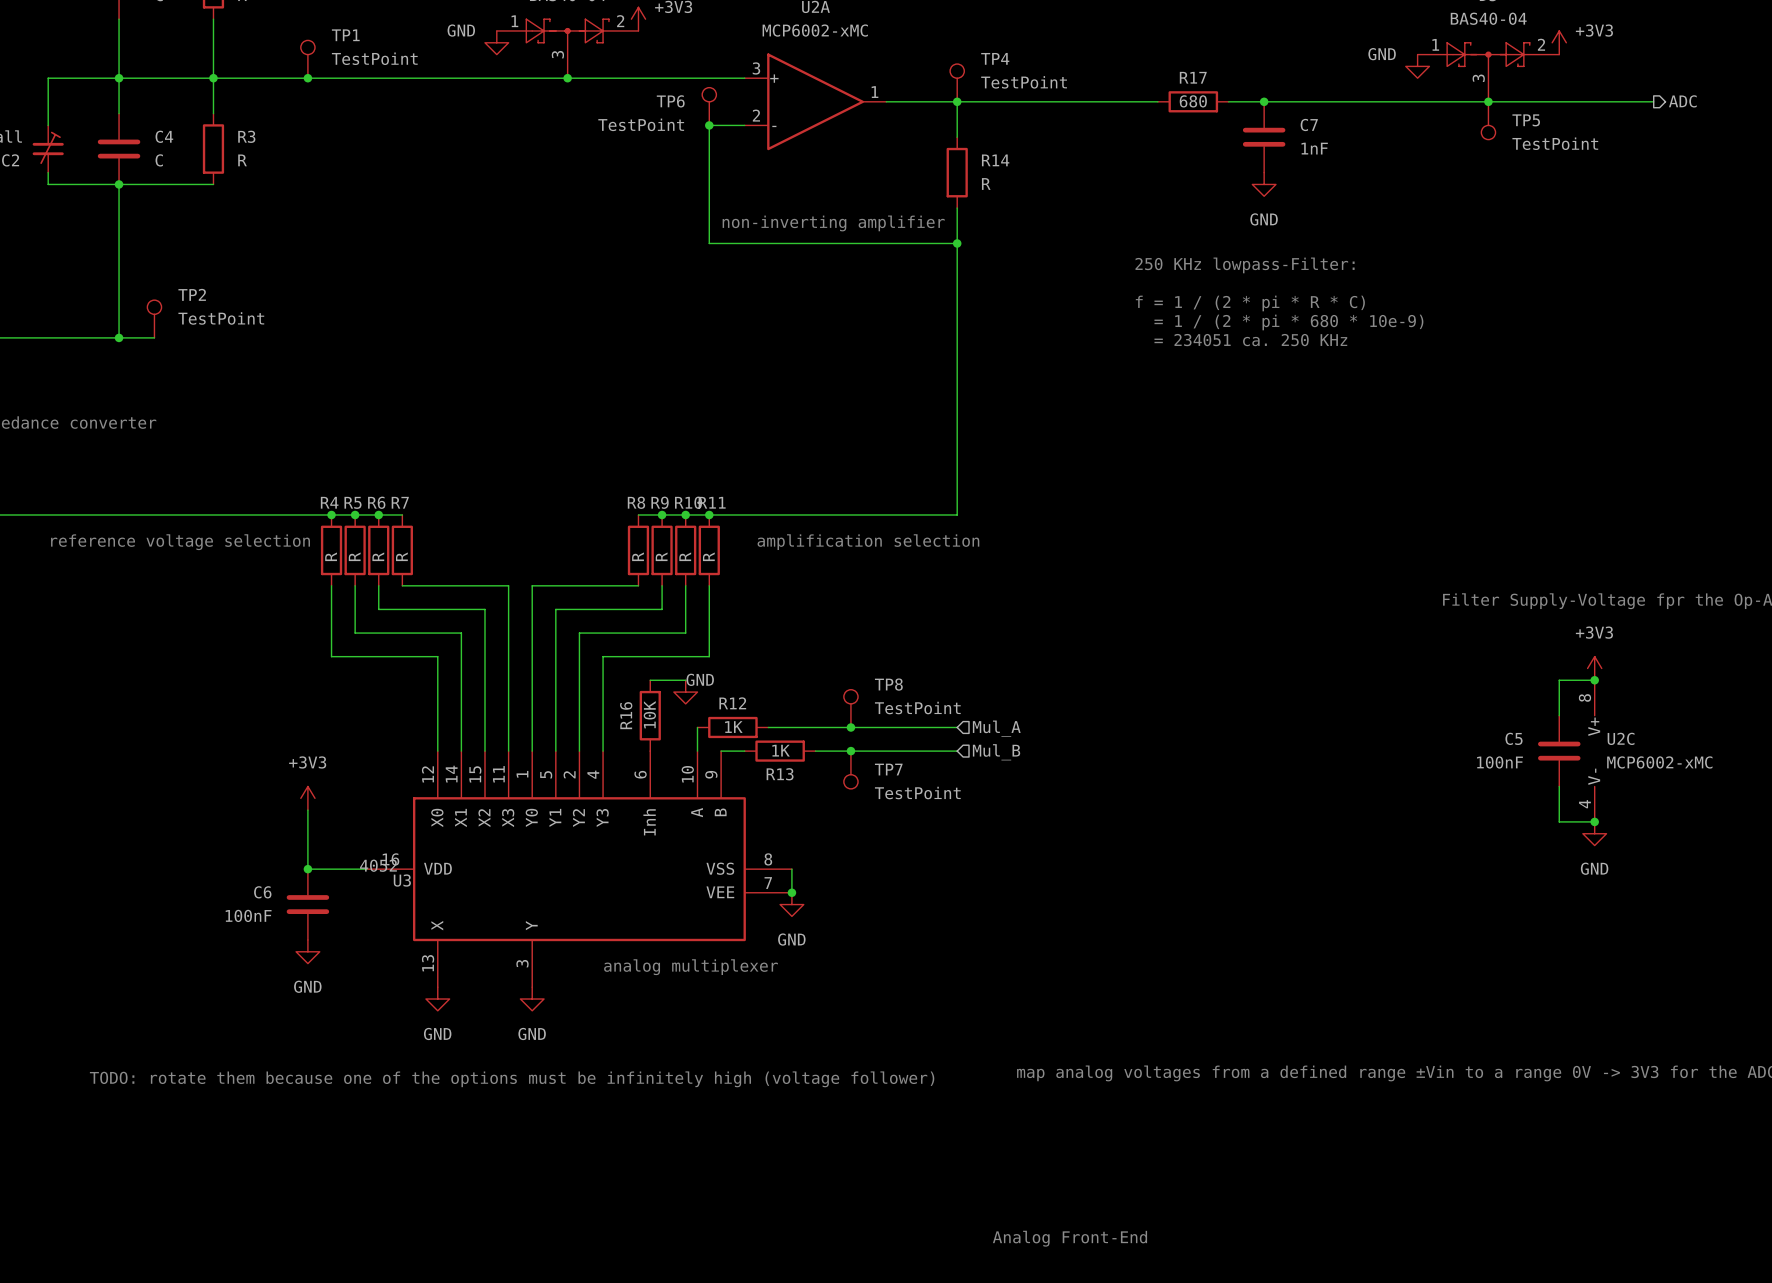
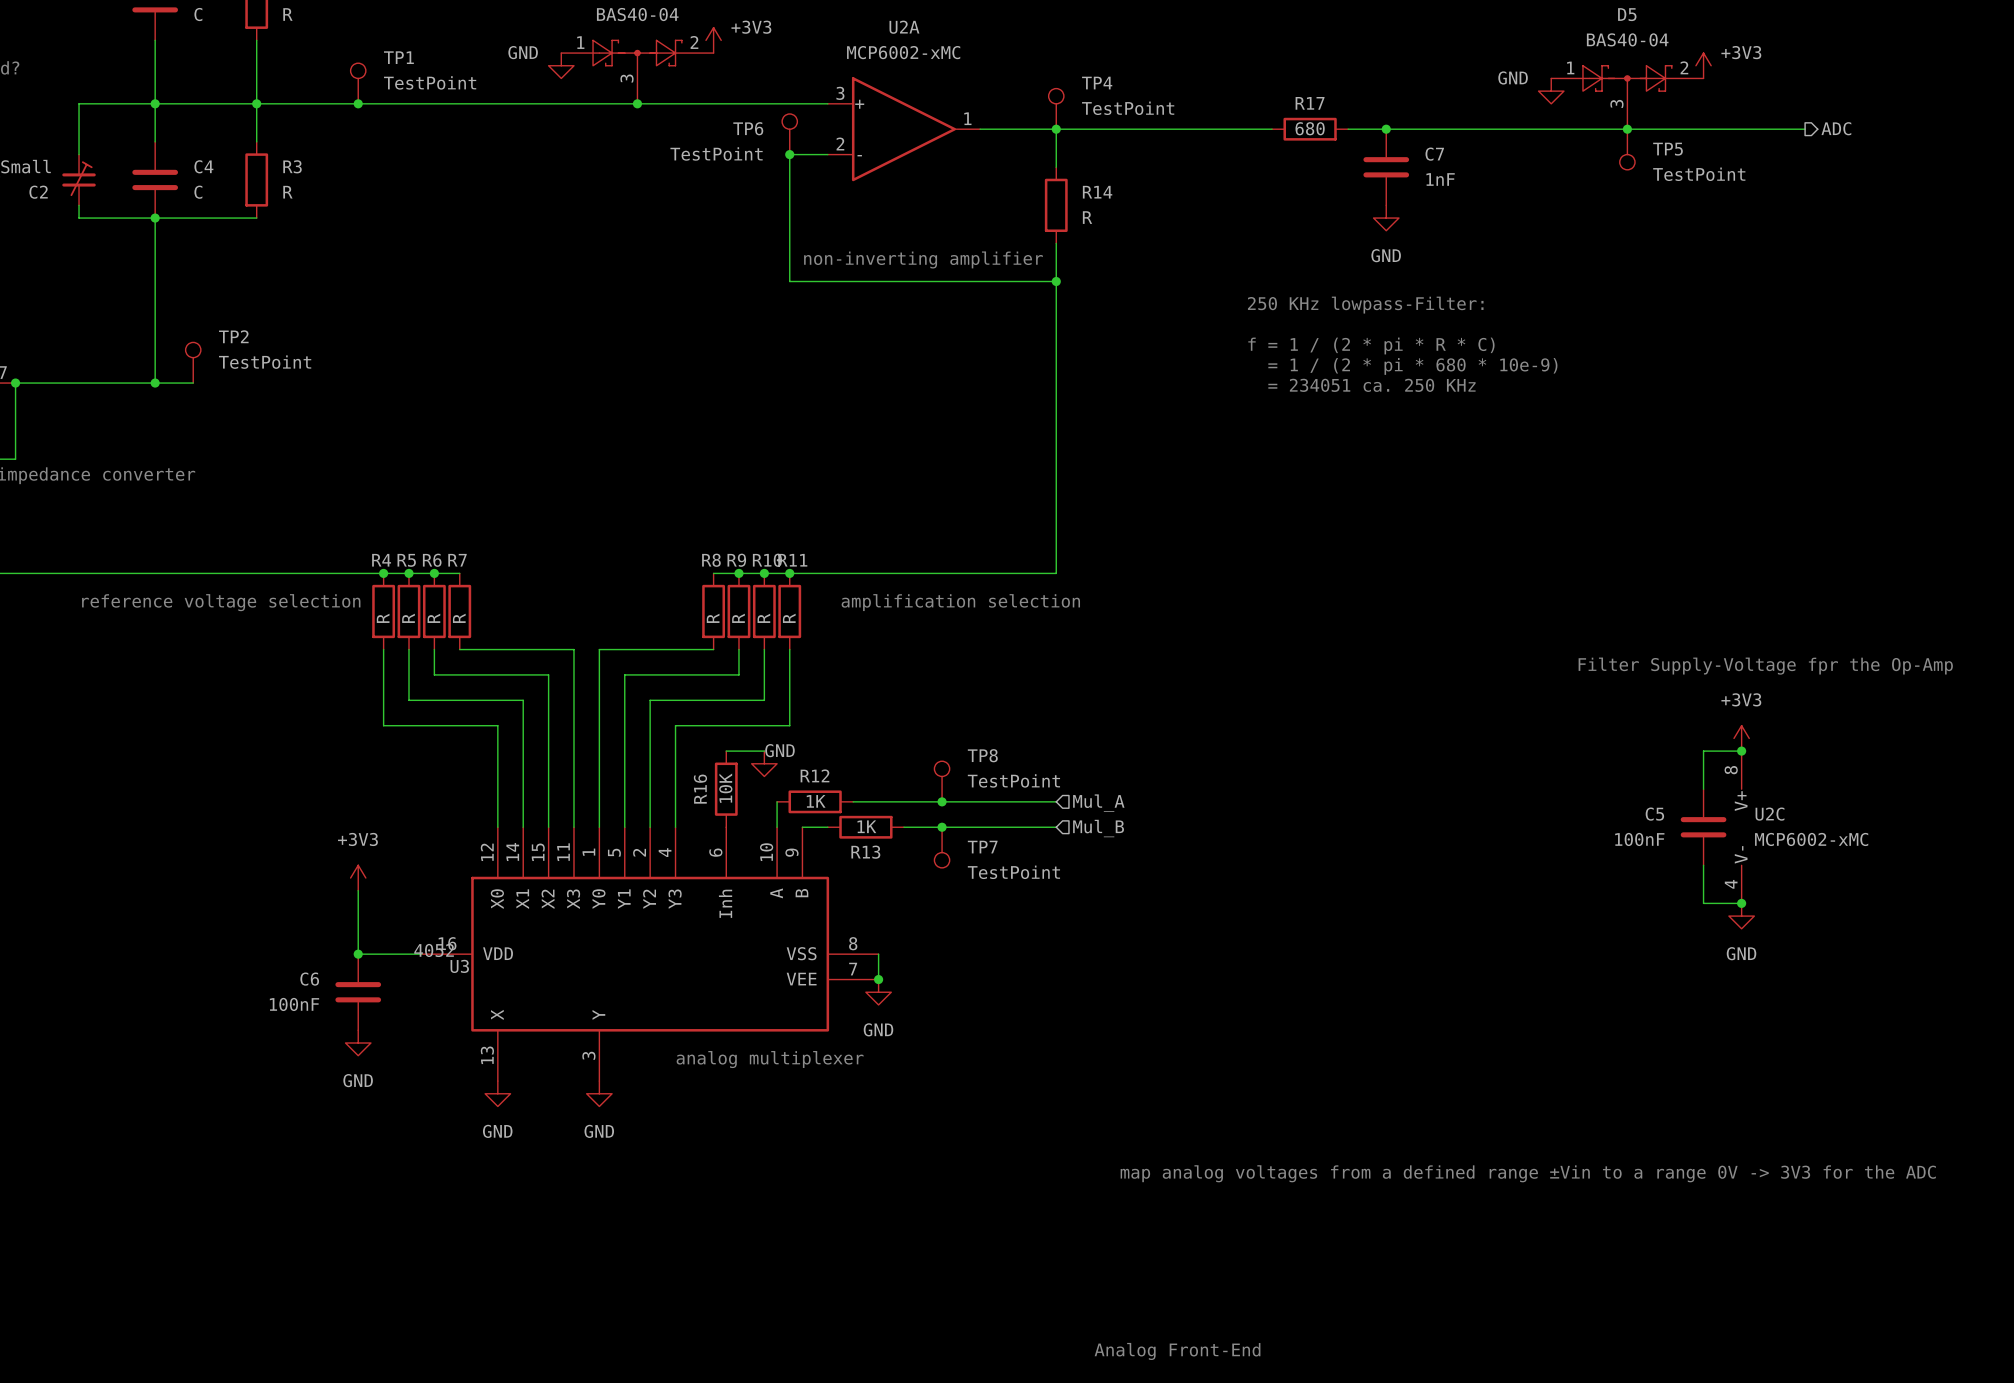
text: TODO: rotate them because one of the options must be infinitely high (voltage follower) (512, 1079) -> none

